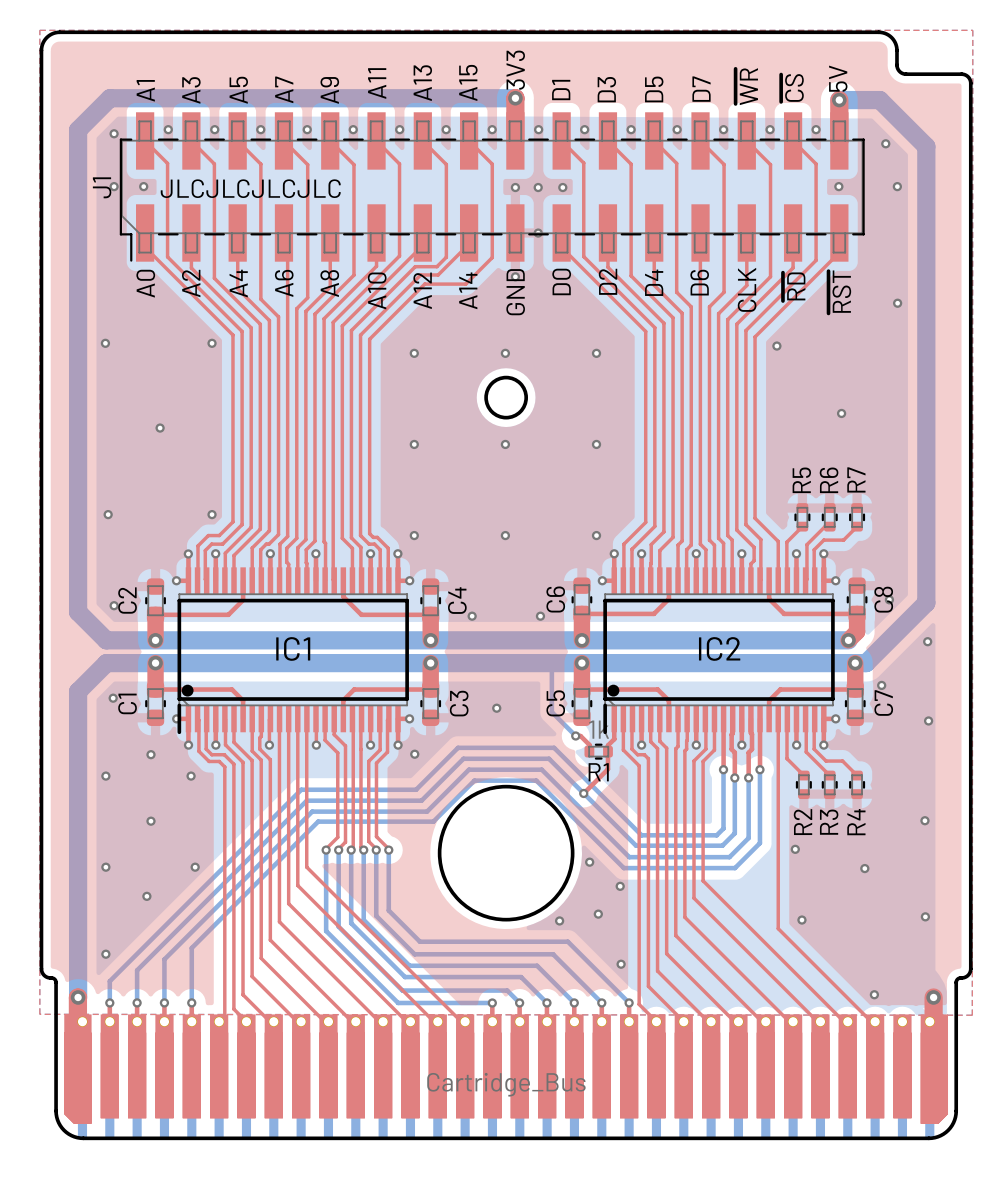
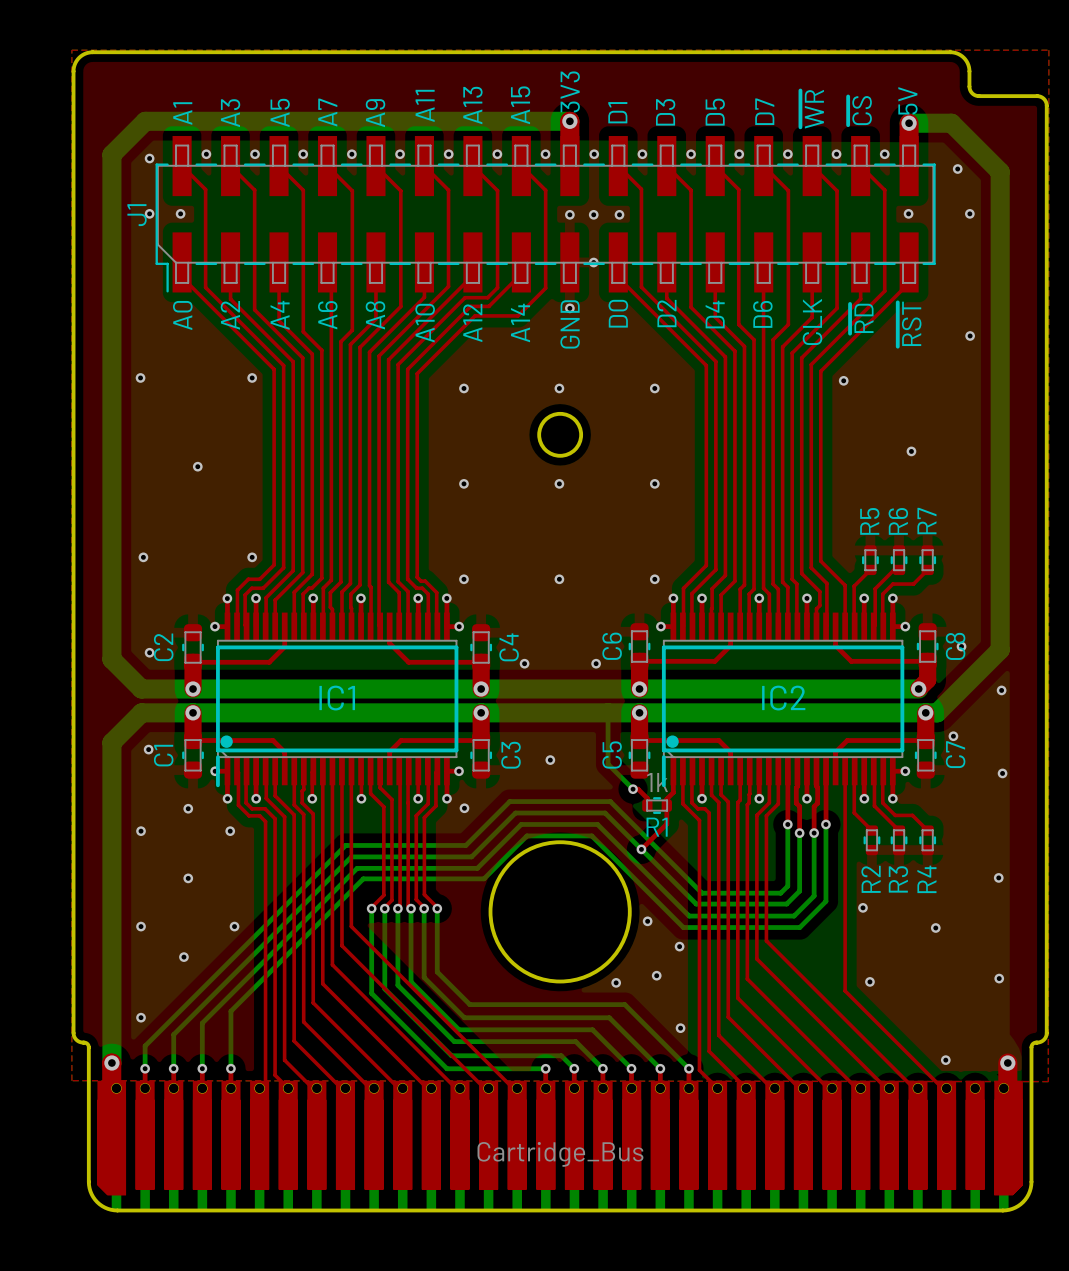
text: JLCJLCJLCJLC (250, 188) -> none

